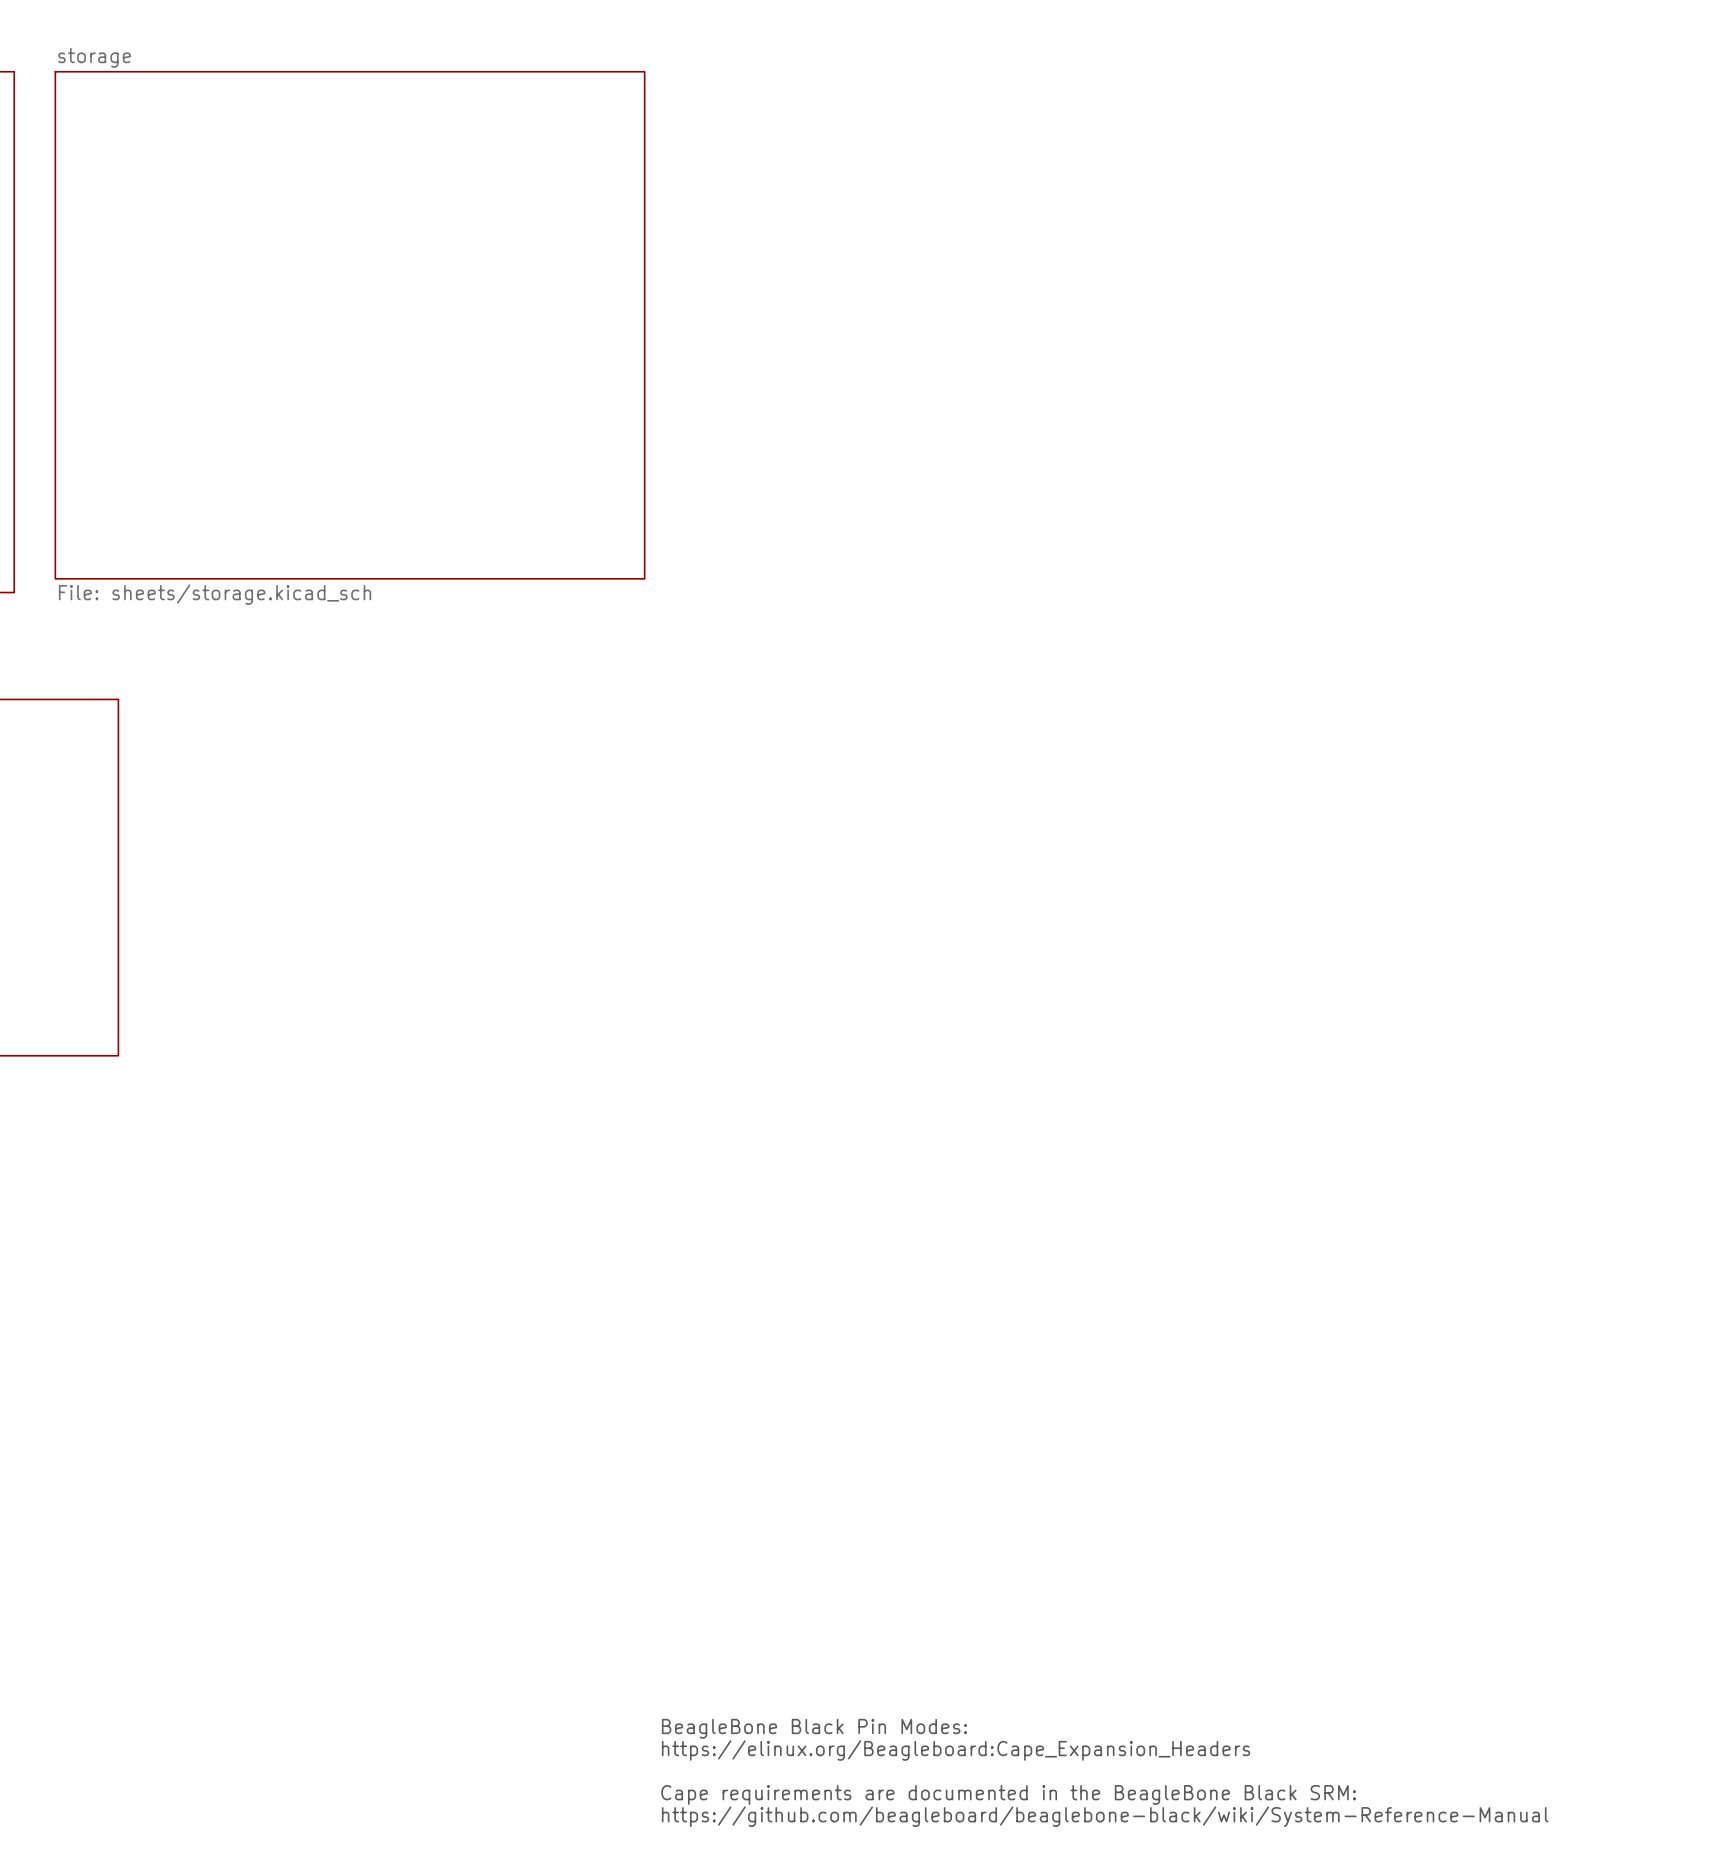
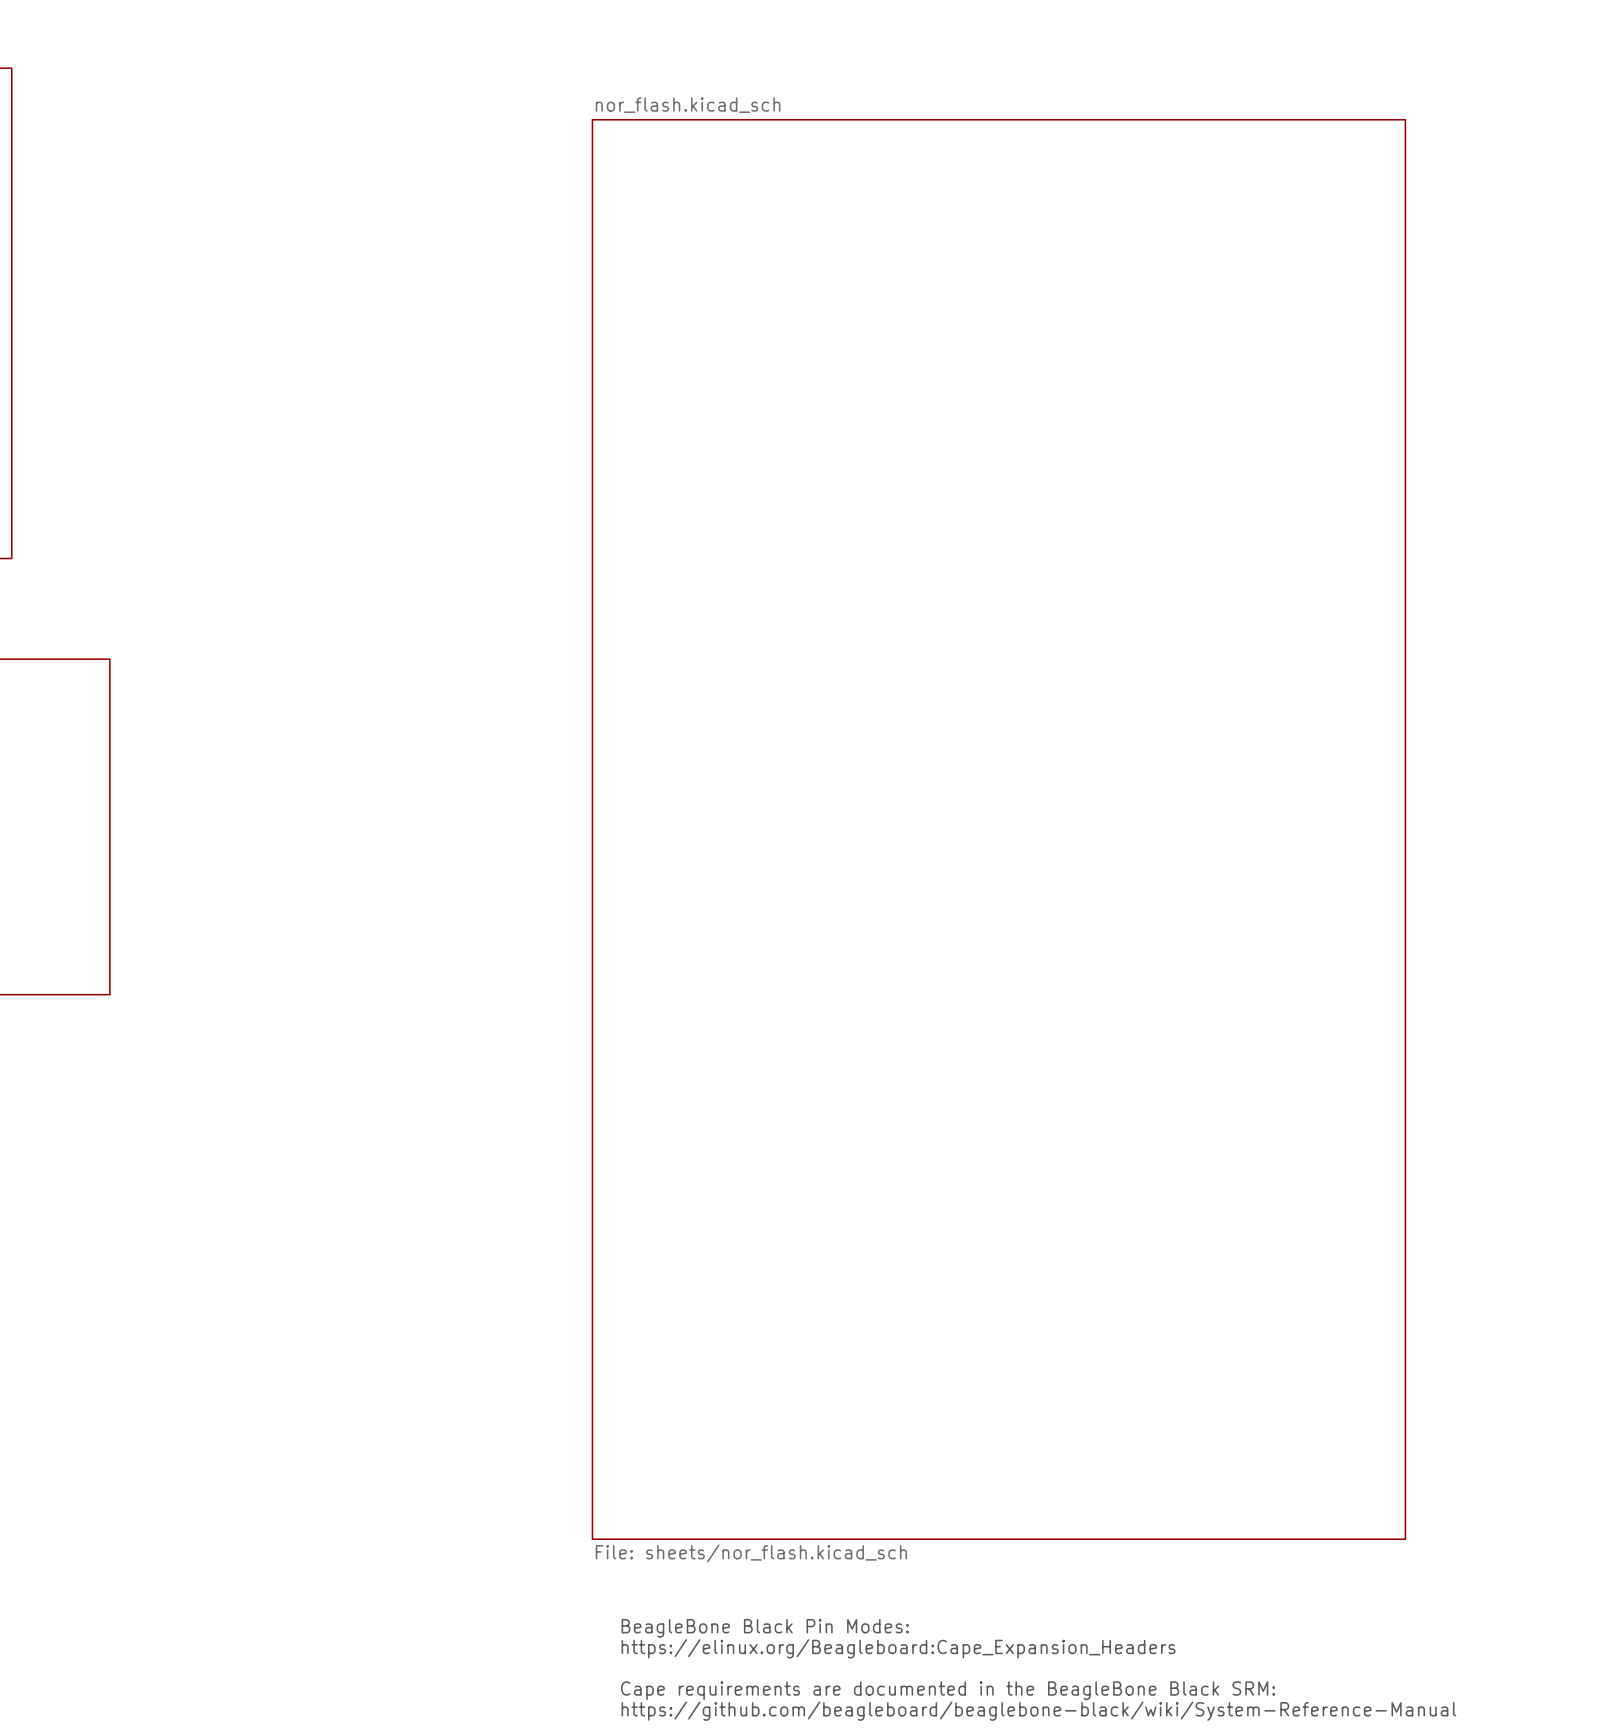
sheet storage: File: sheets/storage.kicad_sch (350, 325) -> none
sheet nor_flash.kicad_sch: none -> File: sheets/nor_flash.kicad_sch (998, 829)

